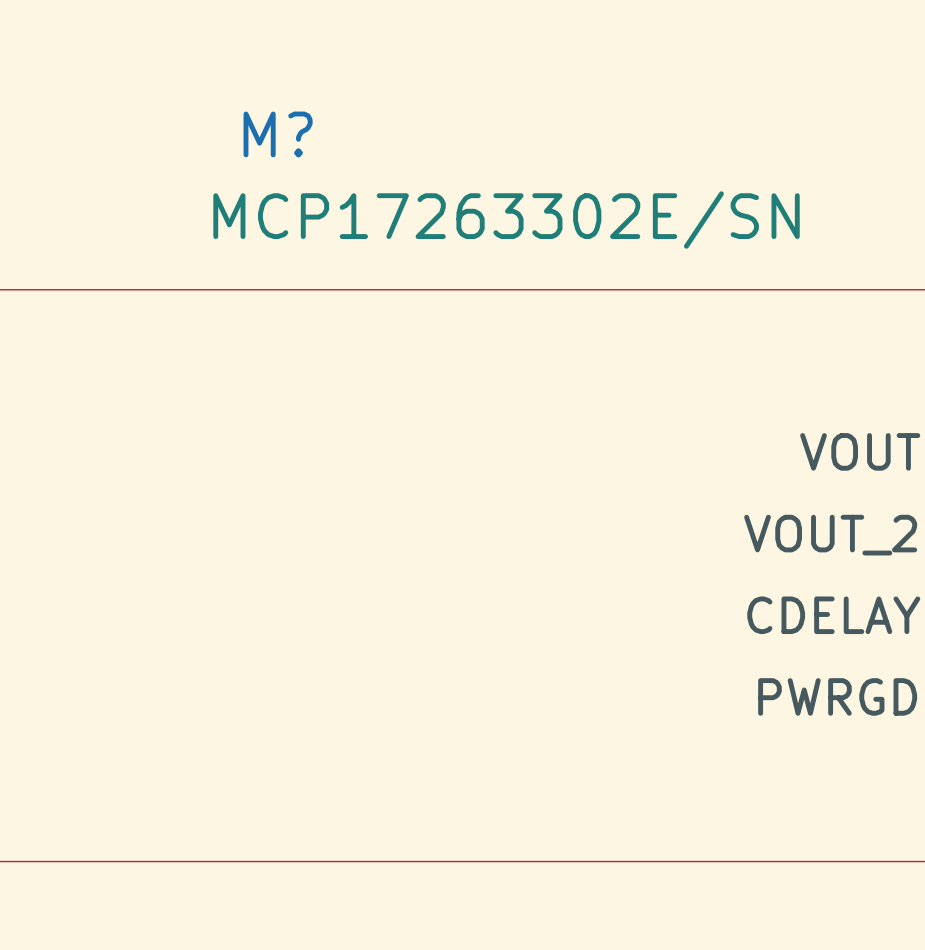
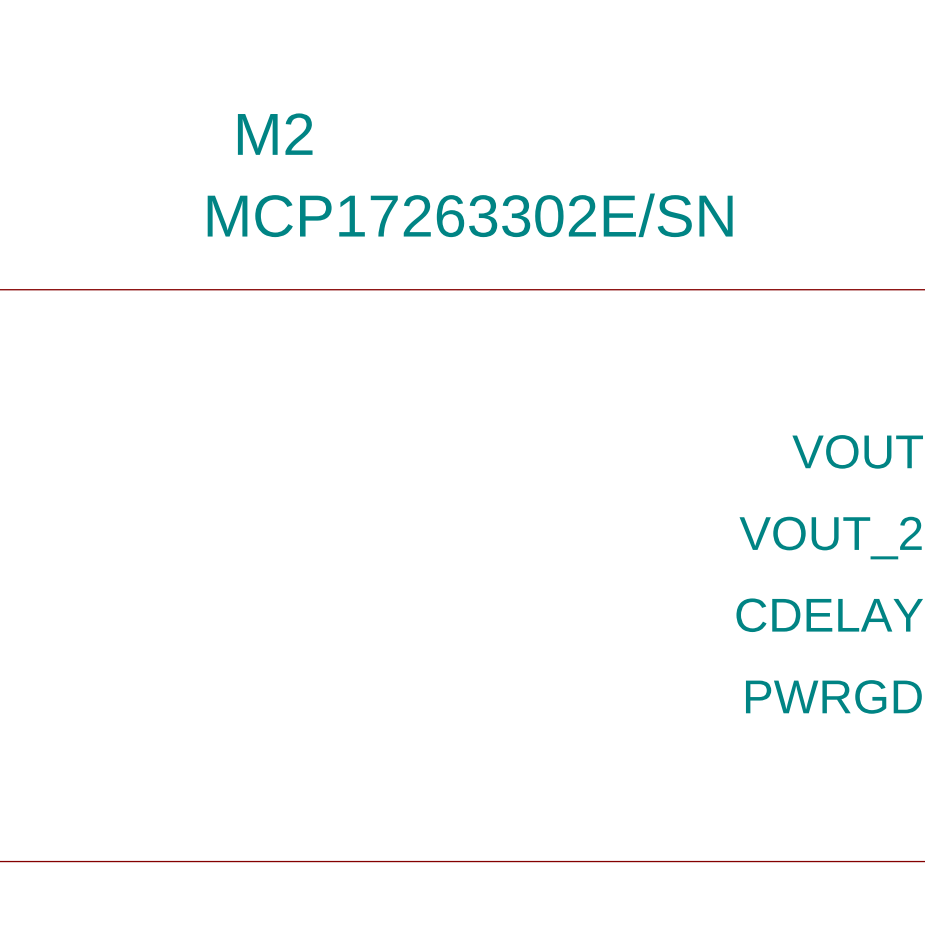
M? name: M? (278, 134) -> M2 (275, 134)

